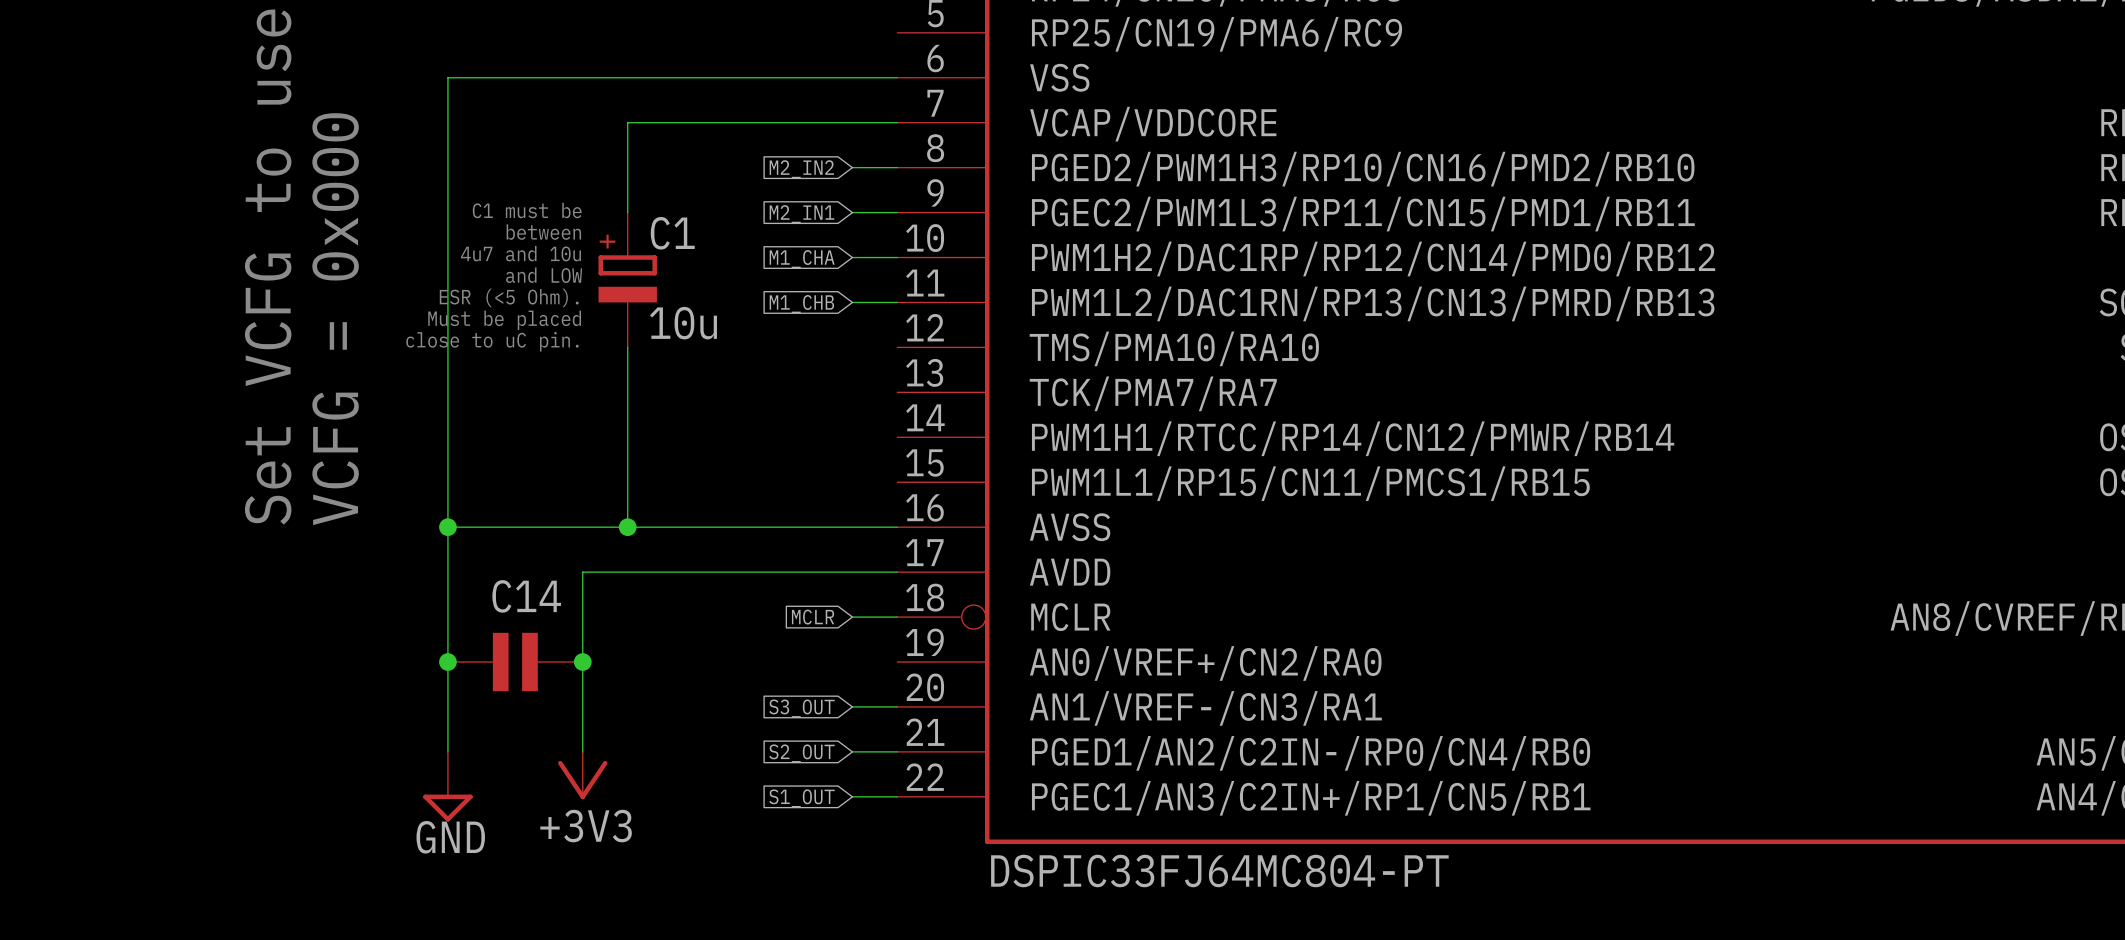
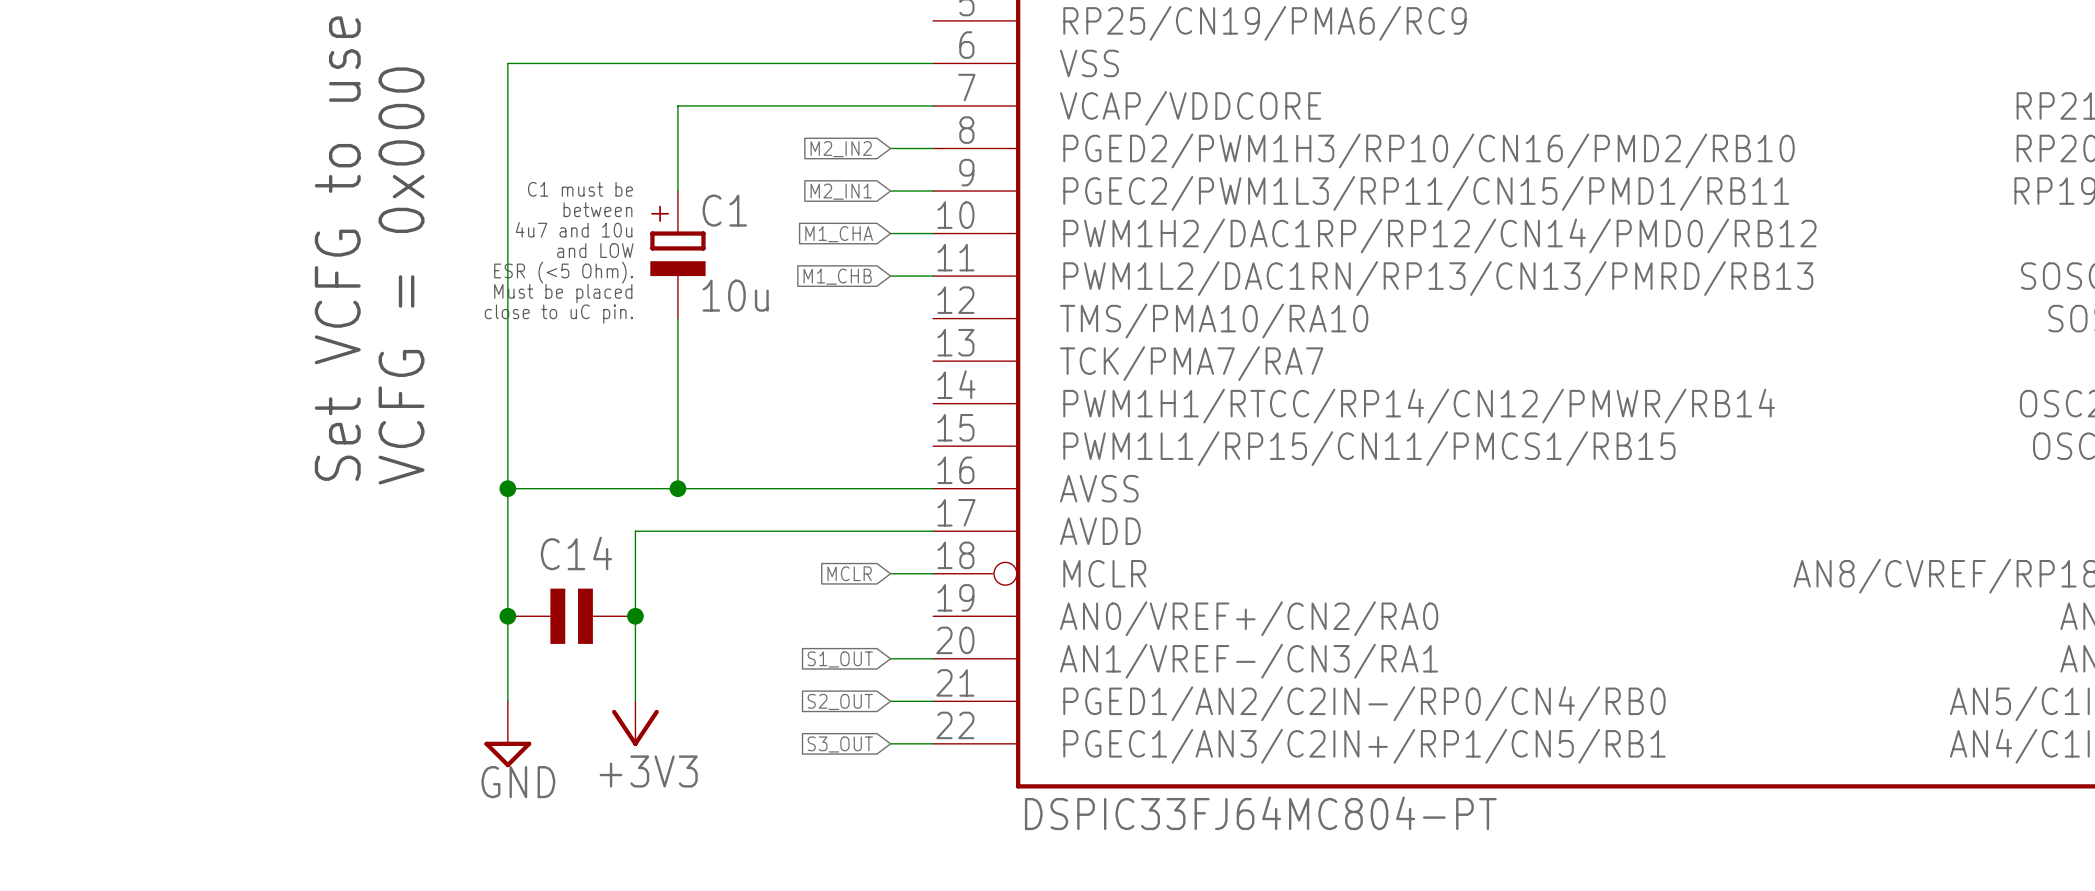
global label: S3_OUT (801, 708) -> S1_OUT (840, 659)
global label: S1_OUT (801, 798) -> S3_OUT (840, 744)

